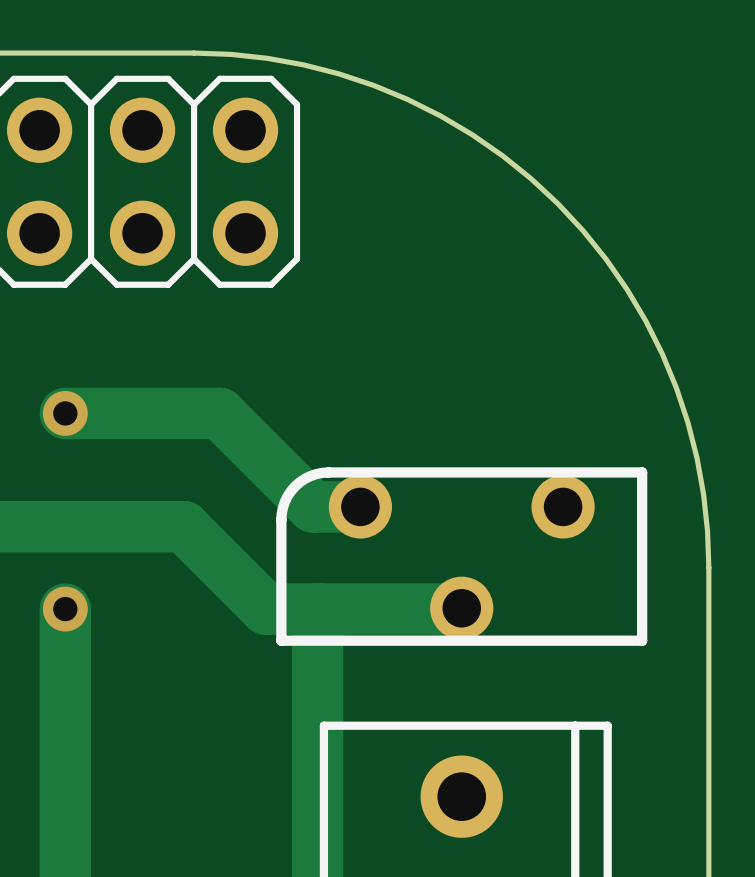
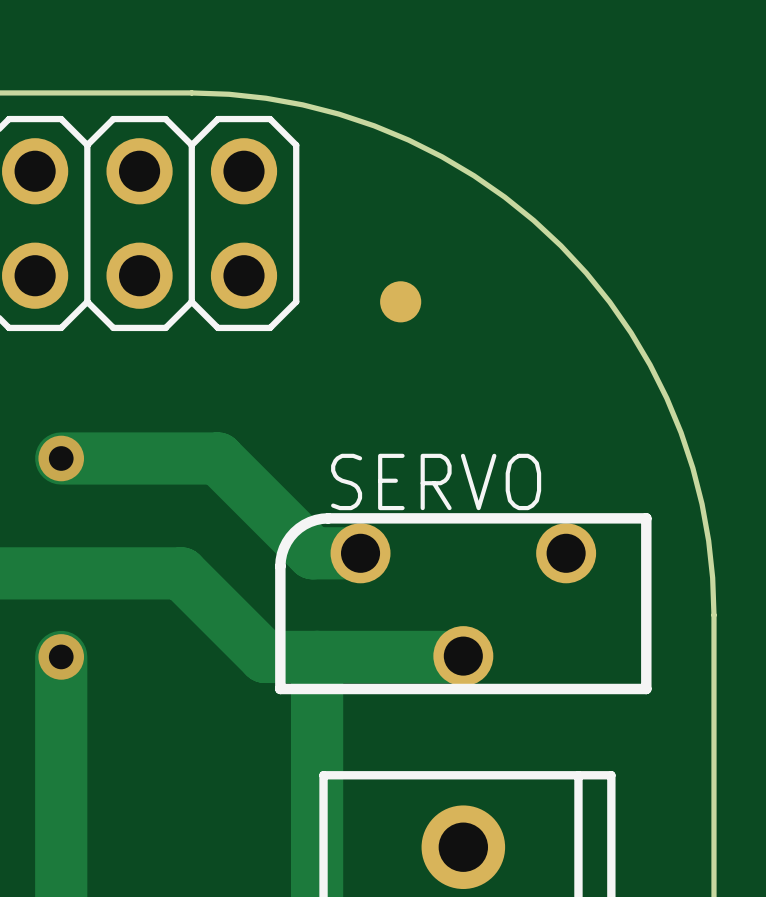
part: none -> (400, 301)
part: (461, 556) -> none
SERVO: none -> (463, 603)

